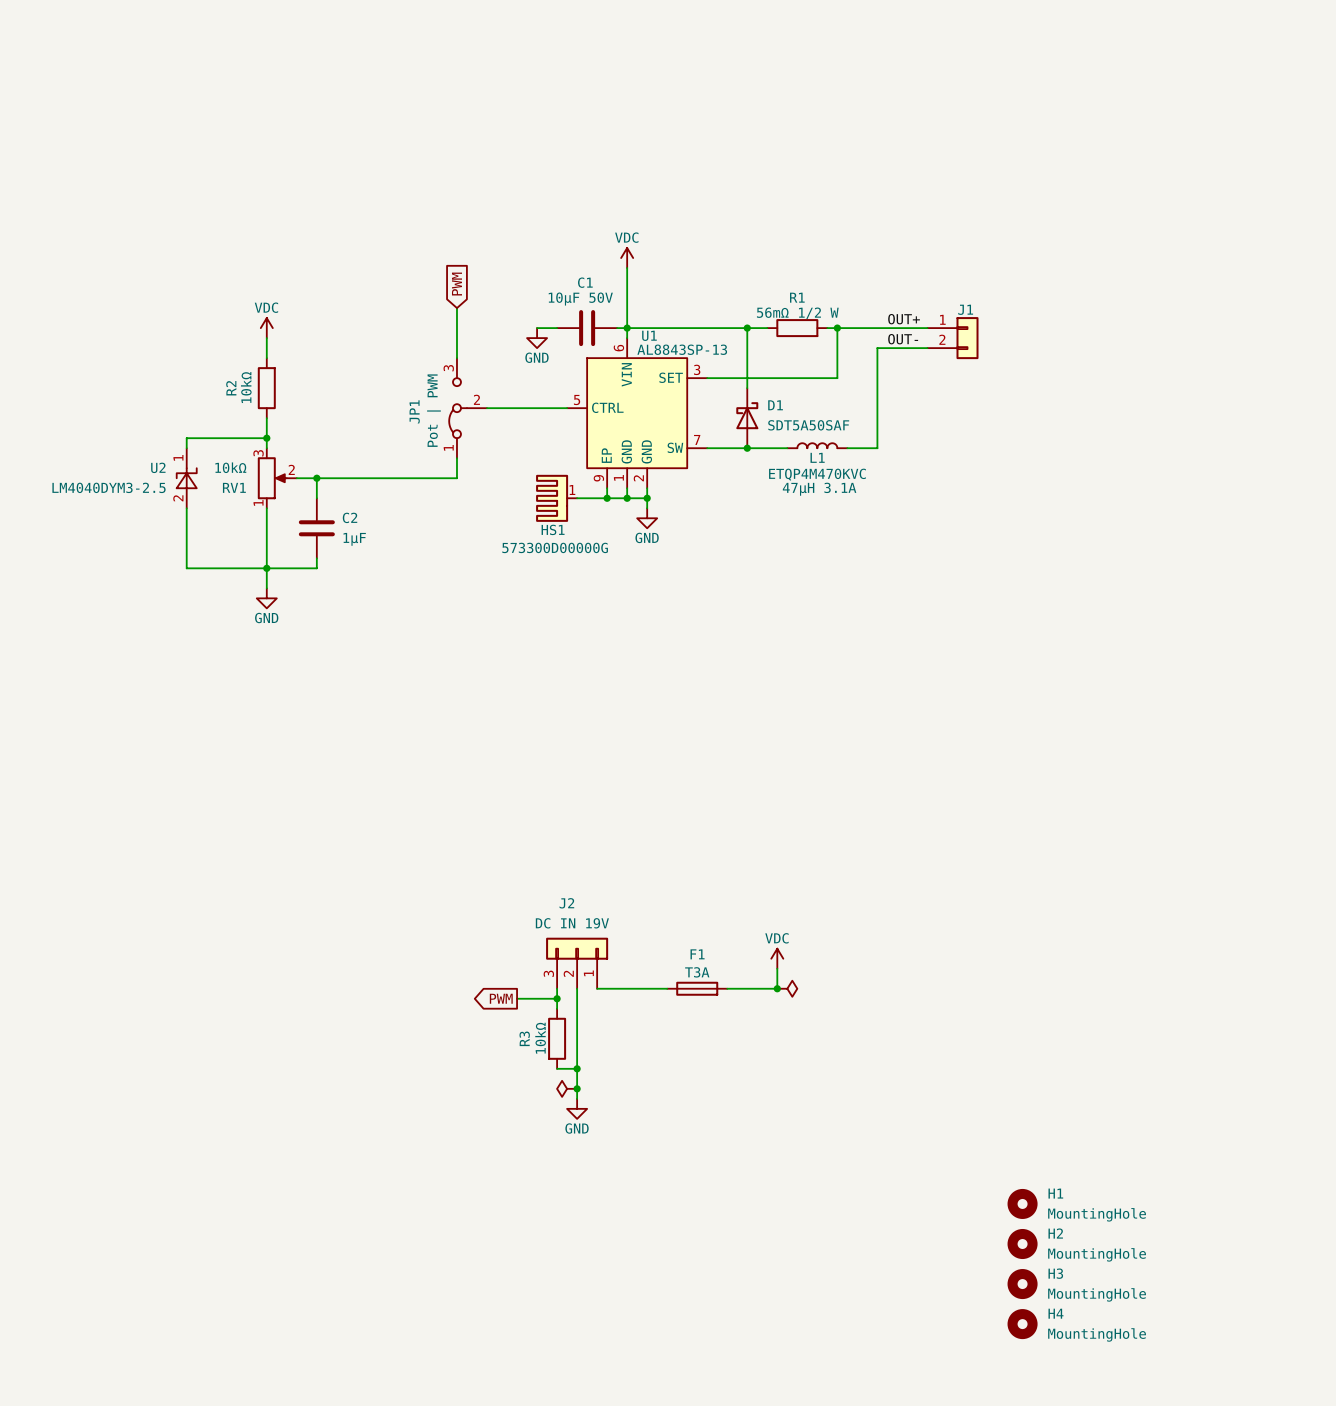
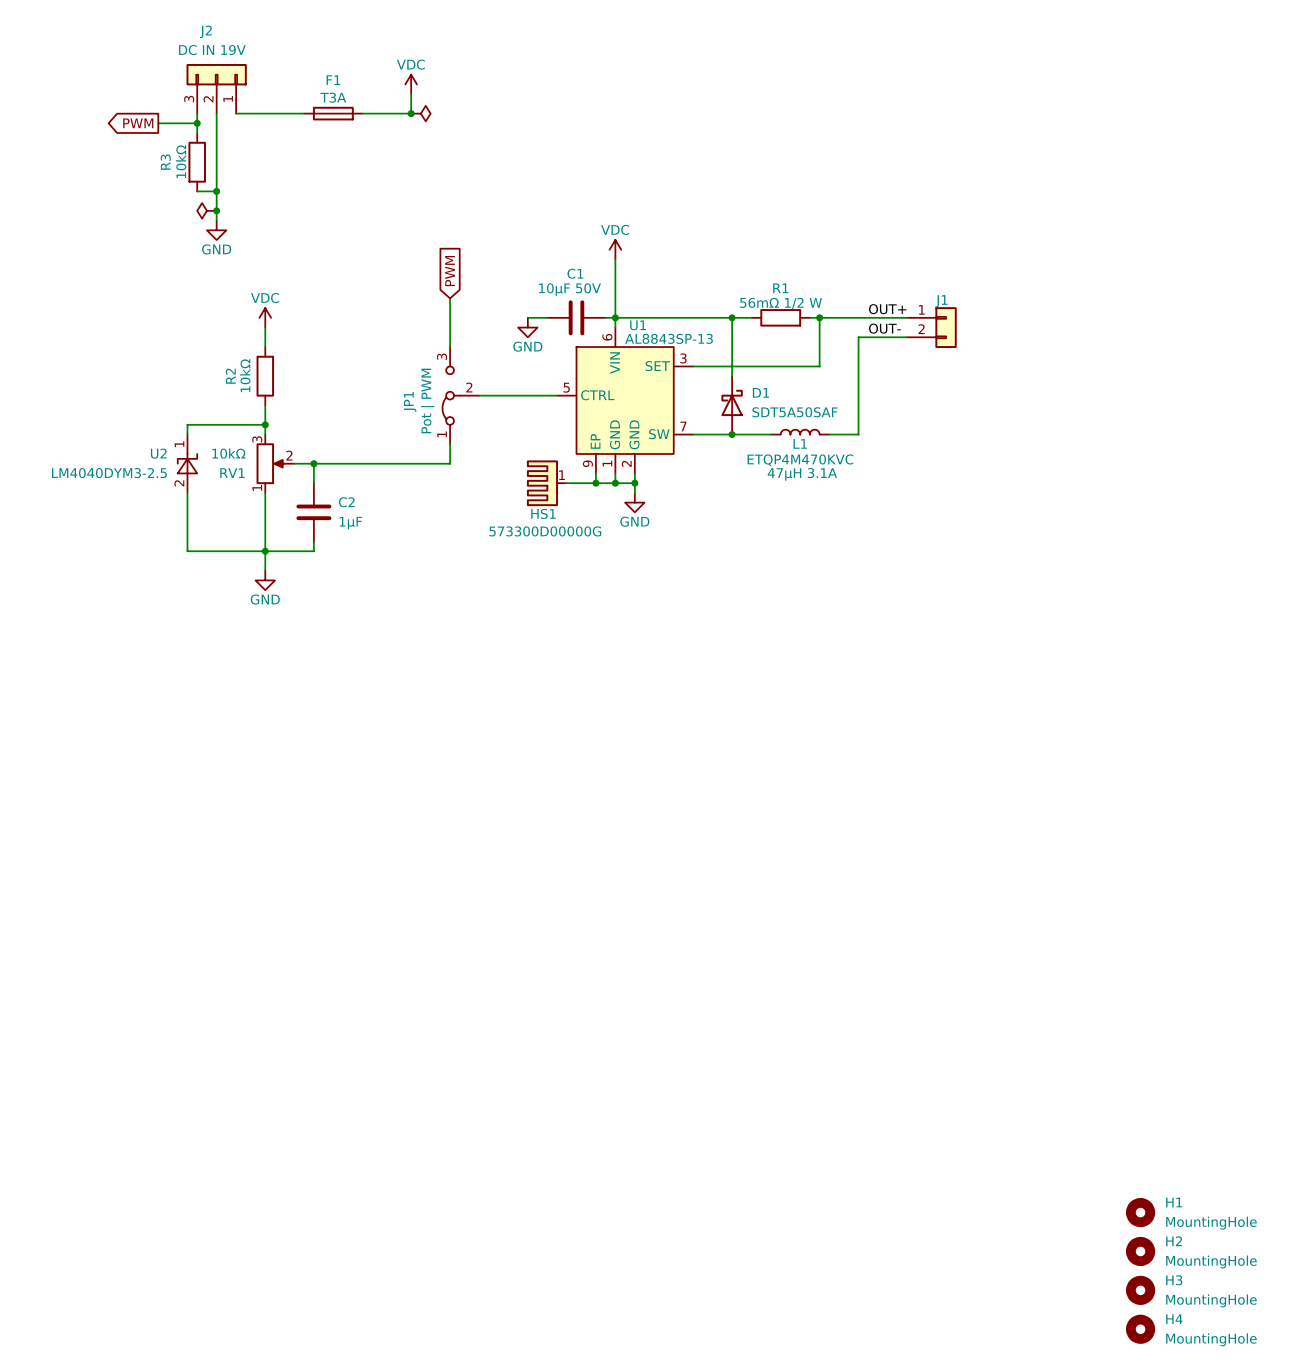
power symbol: none -> VDC (411, 84)
wire: none -> (411, 94) (411, 113) (362, 113)
wire: none -> (197, 113) (197, 133)
wire: none -> (216, 113) (216, 220)
wire: none -> (236, 113) (304, 113)
junction: none -> (411, 113)
power symbol: none -> (420, 113)
global label: none -> PWM (138, 123)
wire: none -> (158, 123) (197, 123)
junction: none -> (197, 123)
wire: none -> (197, 191) (216, 191)
junction: none -> (216, 191)
power symbol: none -> (206, 210)
junction: none -> (216, 210)
power symbol: none -> GND (216, 230)
power symbol: VDC (777, 958) -> none
J2 position: (577, 963) -> (216, 88)
wire: (777, 968) (777, 988) (727, 988) -> none
wire: (557, 988) (557, 1008) -> none
wire: (577, 988) (577, 1098) -> none
wire: (597, 988) (667, 988) -> none
F1 position: (697, 988) -> (333, 113)
junction: (777, 988) -> none
power symbol: (787, 988) -> none
global label: PWM (501, 998) -> none
wire: (517, 998) (557, 998) -> none
junction: (557, 998) -> none
R3 position: (557, 1038) -> (197, 162)
wire: (557, 1068) (577, 1068) -> none
junction: (577, 1068) -> none
power symbol: (567, 1088) -> none
junction: (577, 1088) -> none
power symbol: GND (577, 1108) -> none
H1 position: (1022, 1203) -> (1140, 1212)
H2 position: (1022, 1244) -> (1140, 1251)
H3 position: (1022, 1284) -> (1140, 1290)
H4 position: (1022, 1324) -> (1140, 1329)

